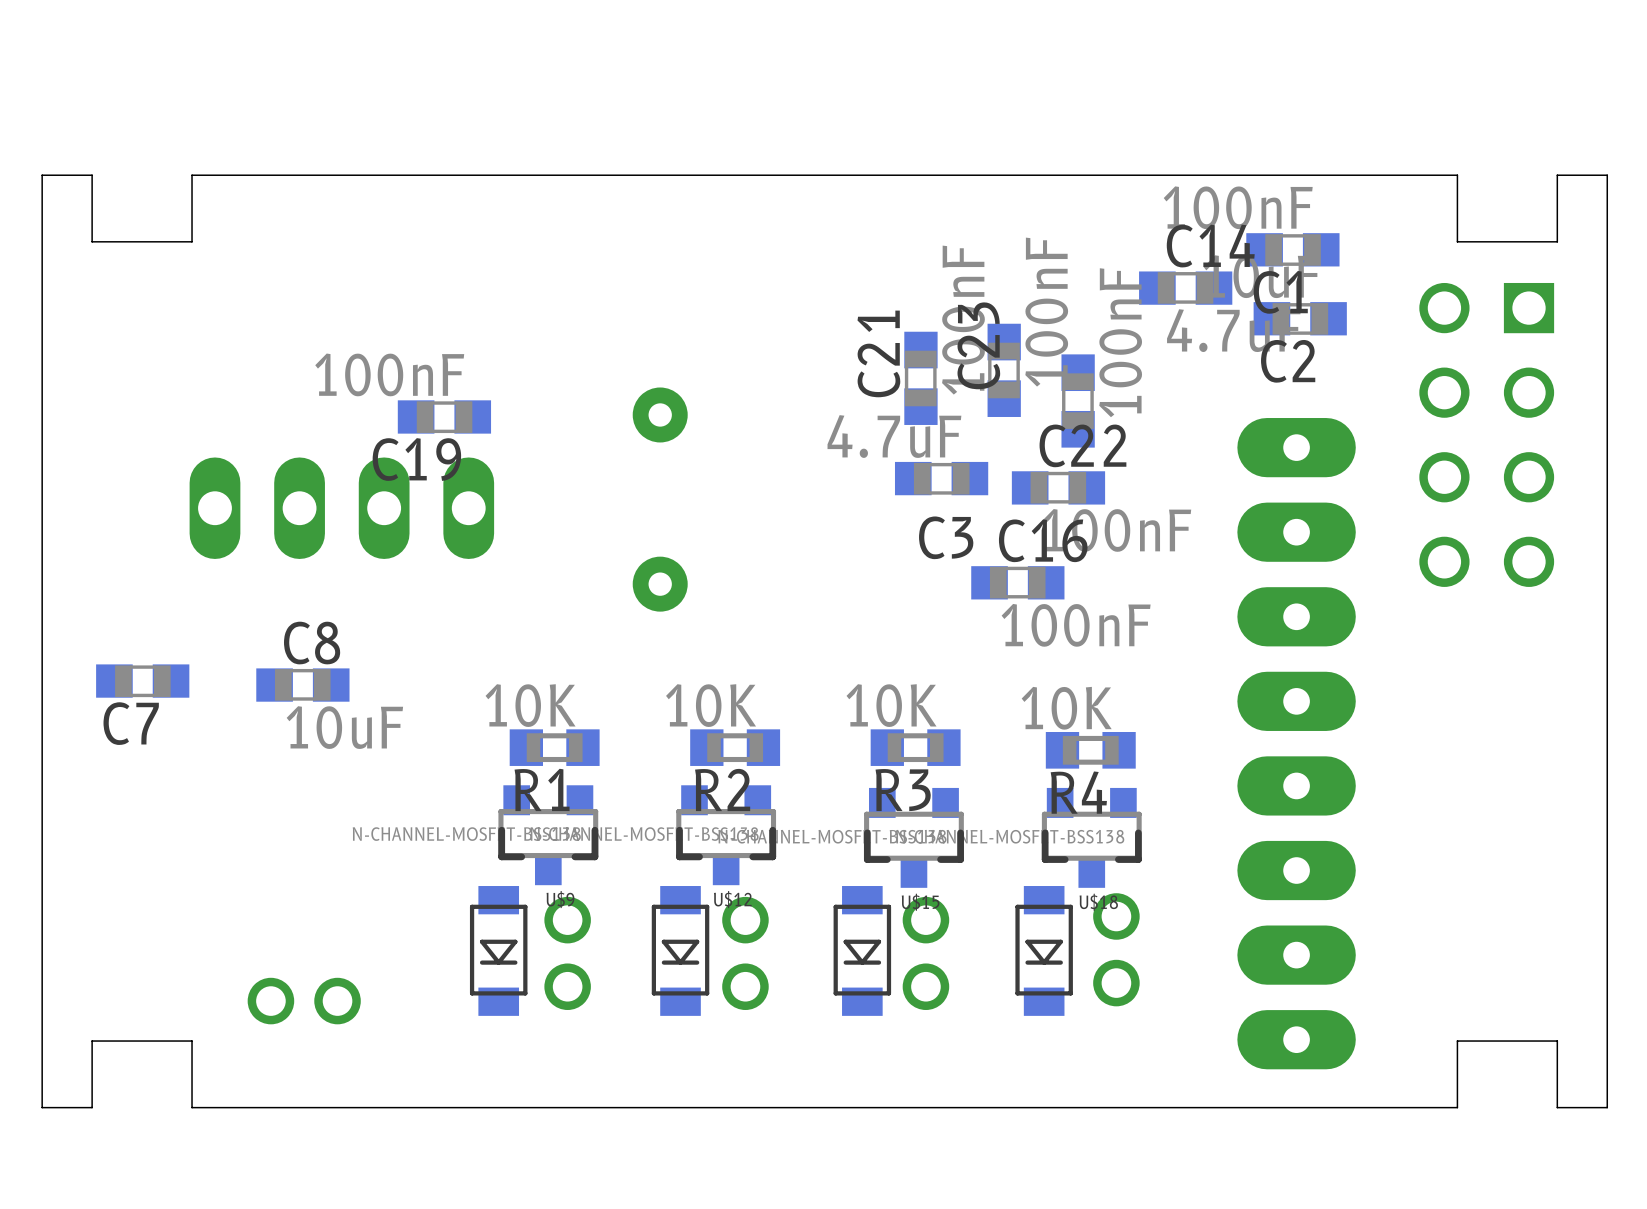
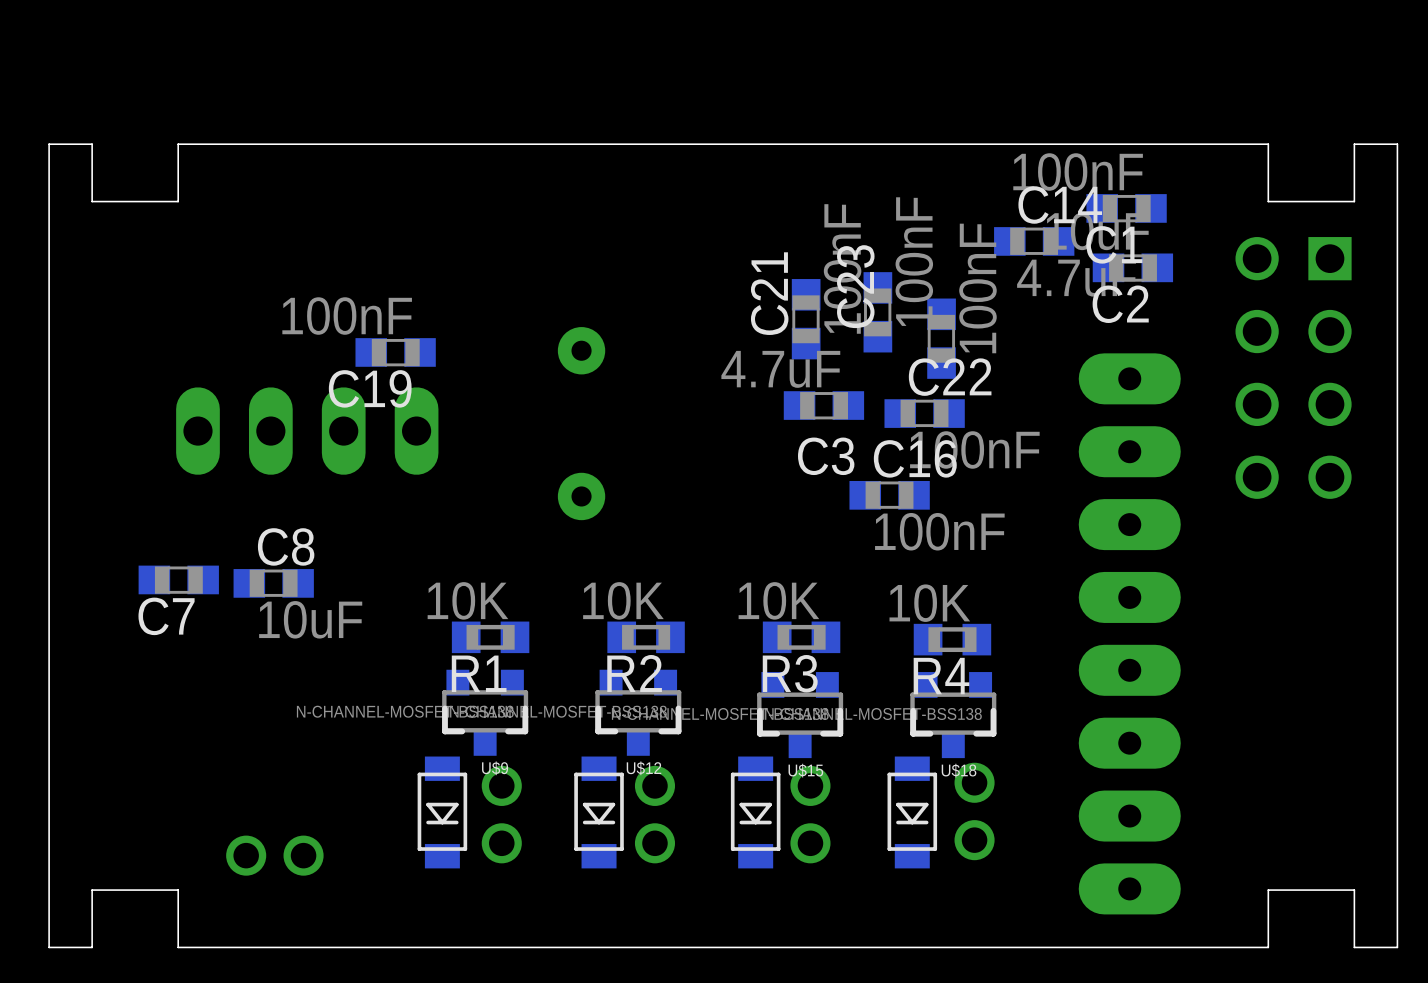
C7 position: (142, 681) -> (178, 579)

